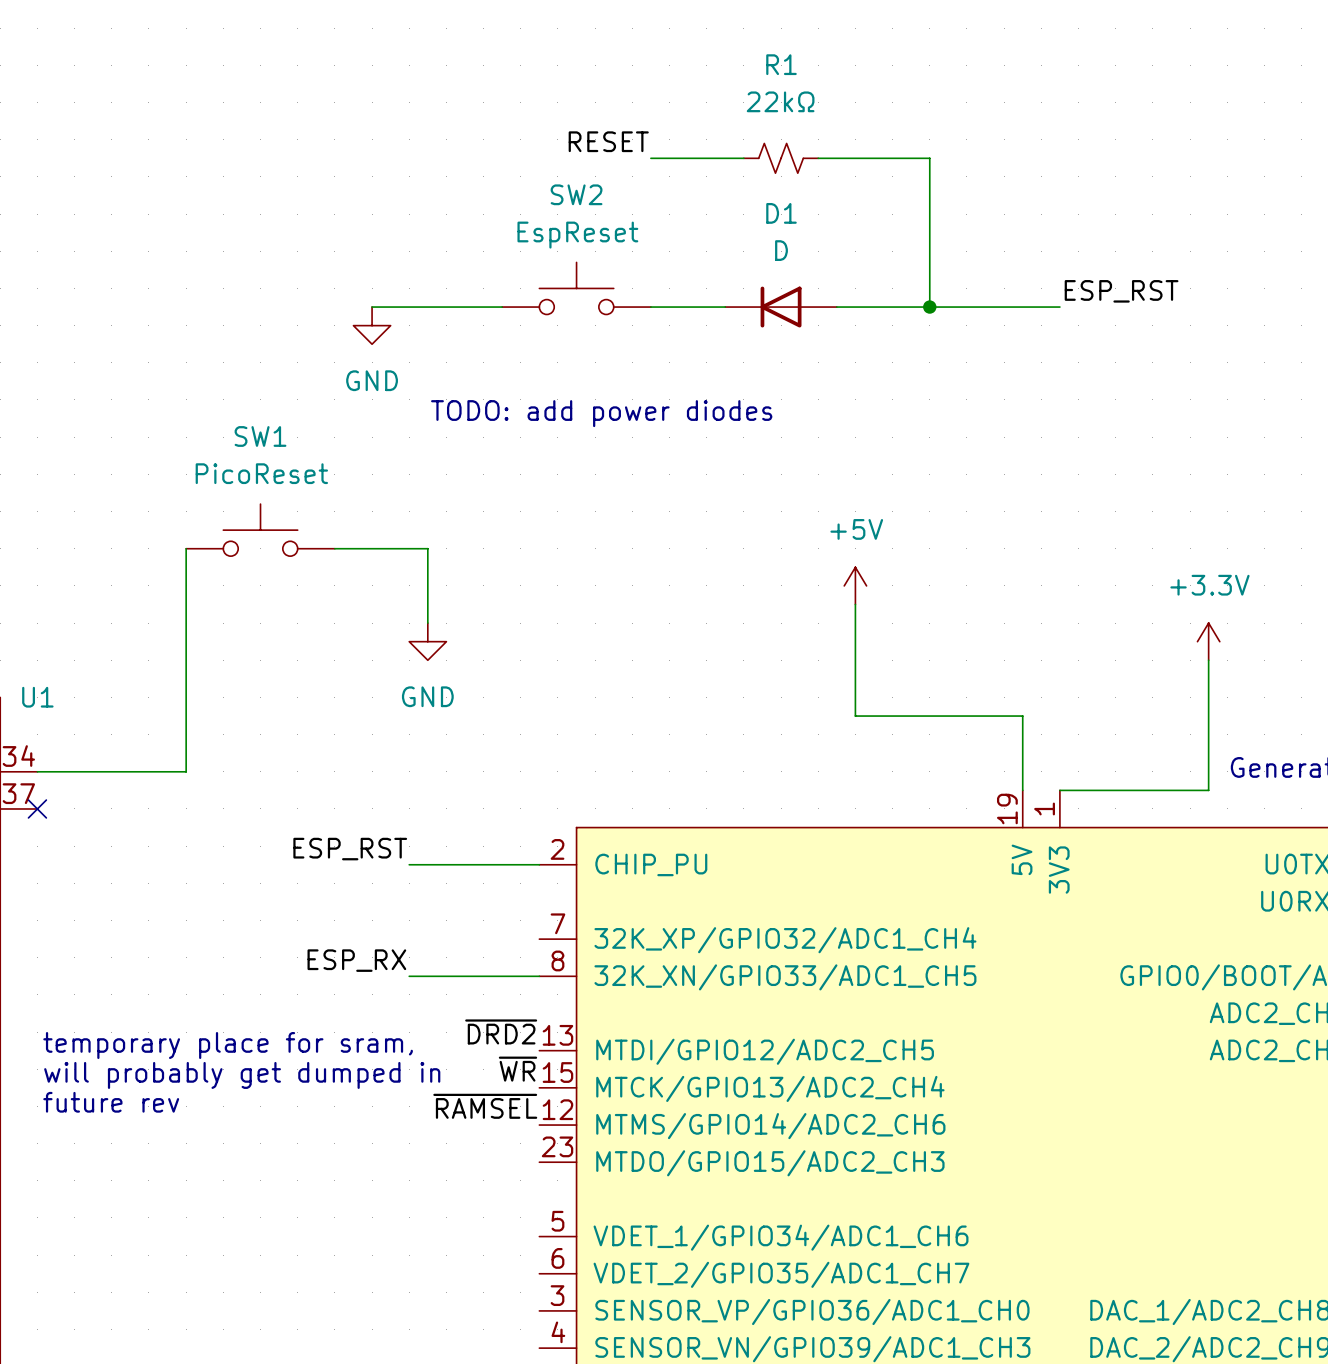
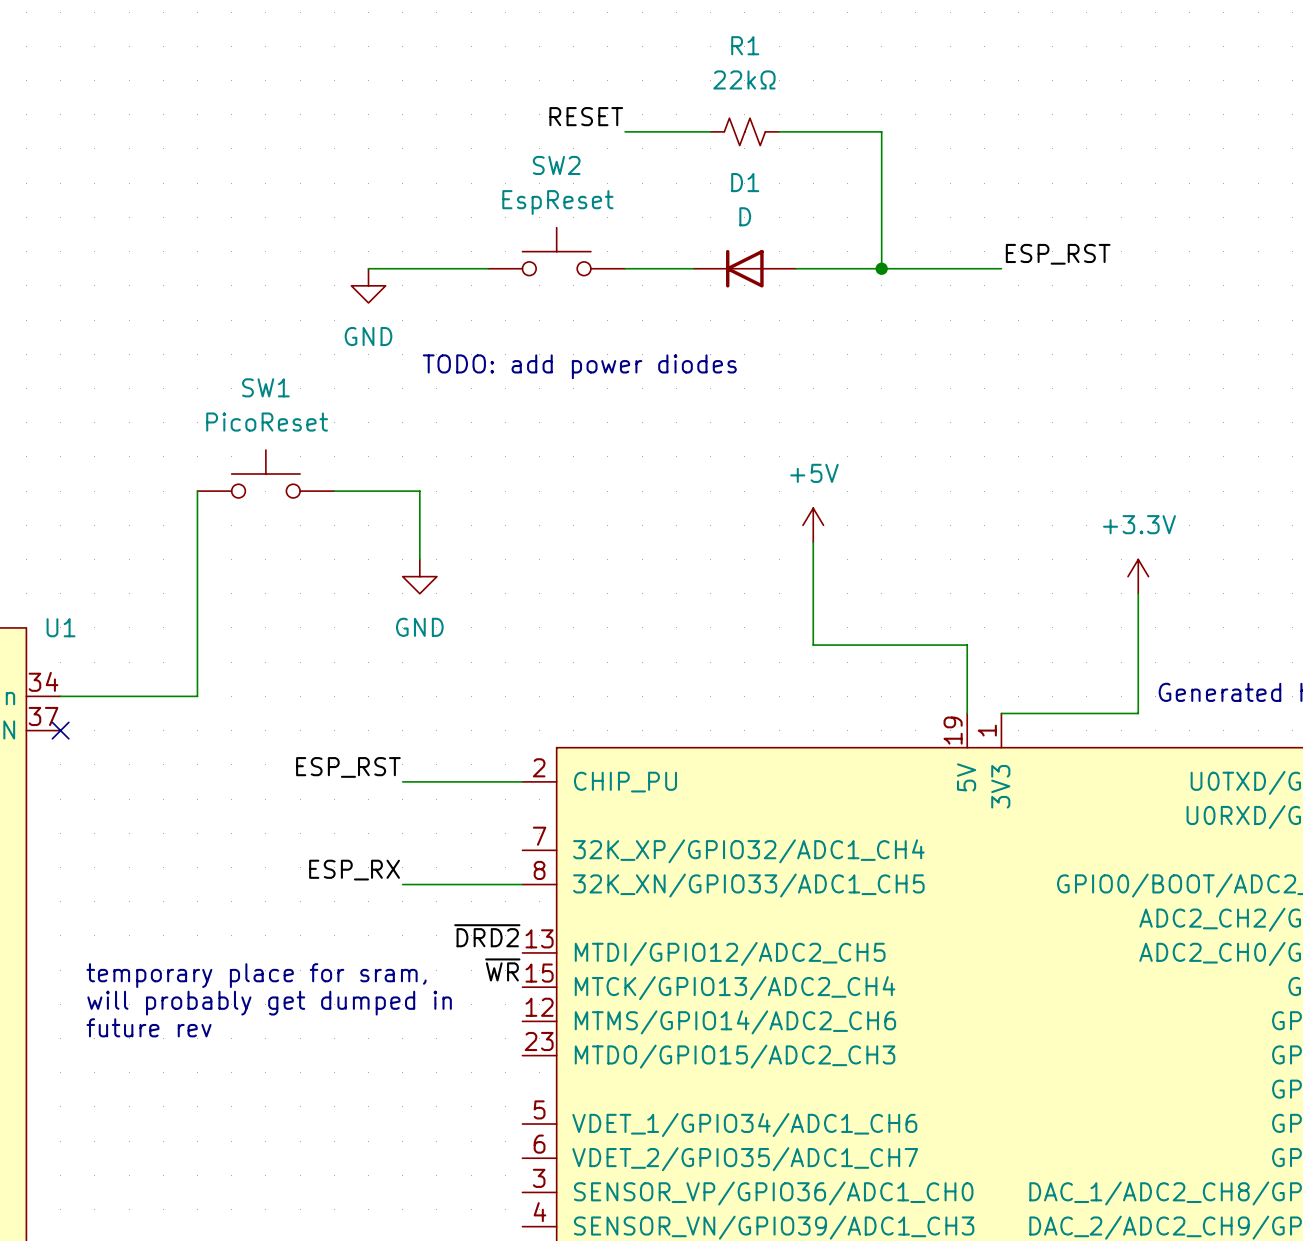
text position: temporary place for sram, (228, 1045) -> temporary place for sram, (256, 975)
text position: will probably get dumped in (242, 1075) -> will probably get dumped in (269, 1003)
text position: future rev (111, 1102) -> future rev (149, 1027)
label: ~{RAMSEL} (485, 1106) -> none

